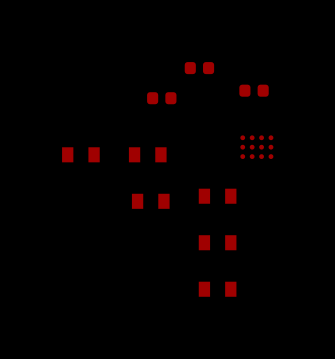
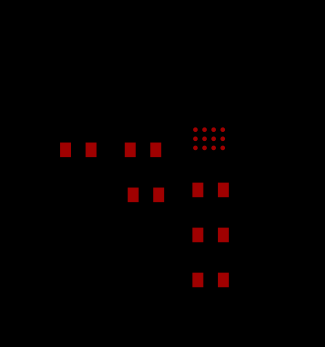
part: (199, 68) -> none
part: (254, 90) -> none
part: (161, 98) -> none
part position: (256, 147) -> (209, 138)

